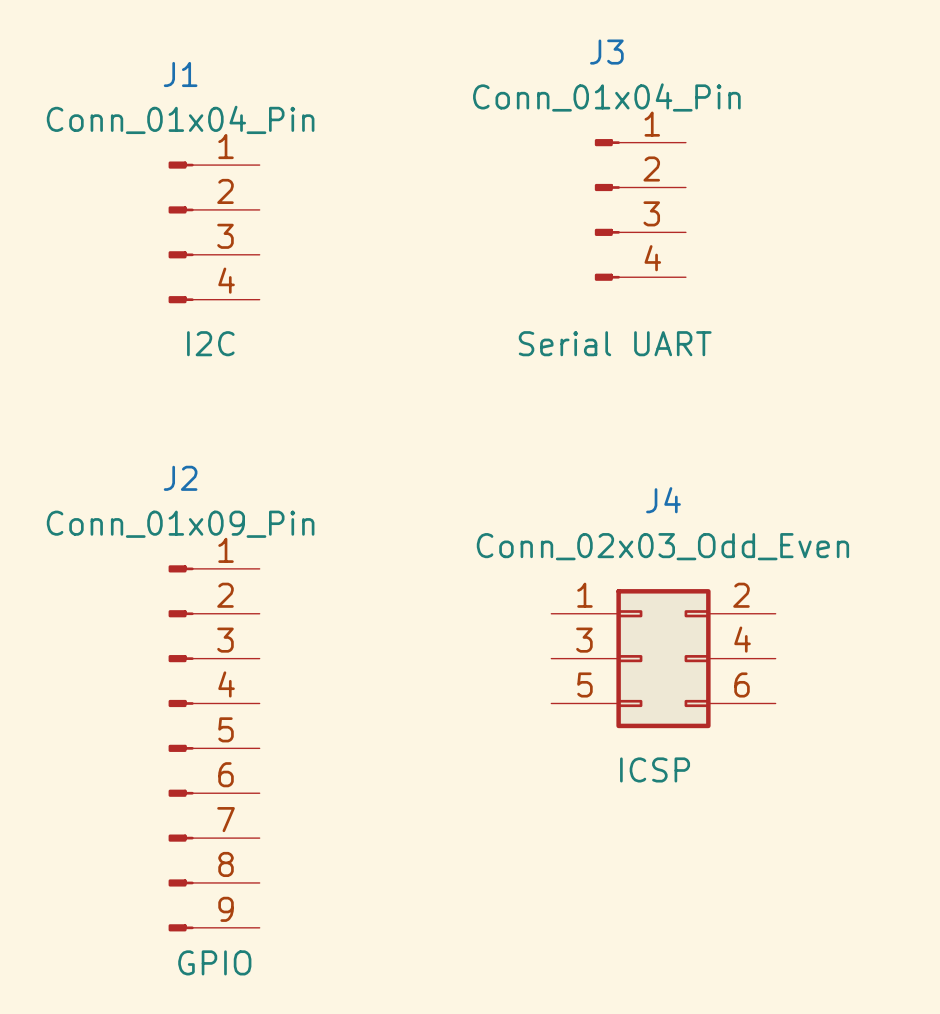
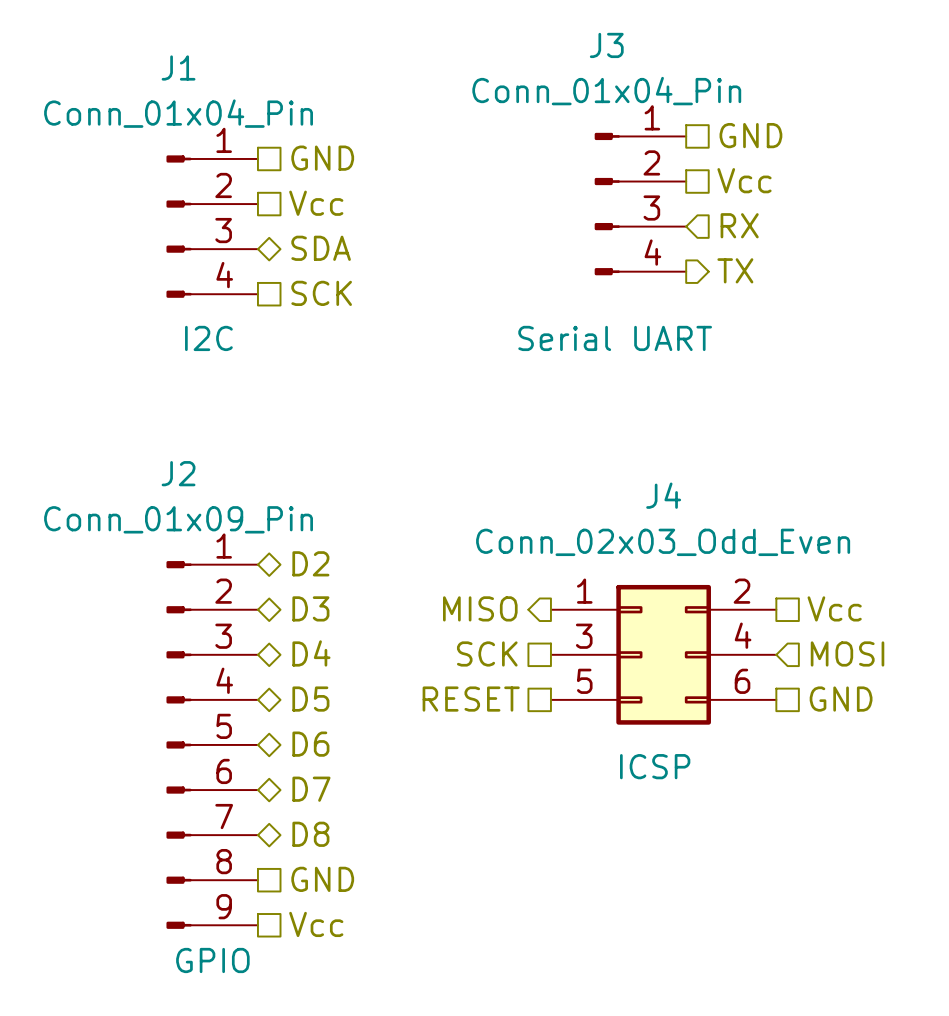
hierarchical label: none -> GND (750, 135)
hierarchical label: none -> GND (322, 158)
hierarchical label: none -> Vcc (744, 180)
hierarchical label: none -> Vcc (316, 203)
hierarchical label: none -> RX (739, 225)
hierarchical label: none -> SDA (321, 248)
hierarchical label: none -> TX (735, 270)
hierarchical label: none -> SCK (321, 293)
hierarchical label: none -> D2 (310, 563)
hierarchical label: none -> D3 (310, 608)
hierarchical label: none -> MISO (480, 608)
hierarchical label: none -> Vcc (834, 608)
hierarchical label: none -> D4 (311, 653)
hierarchical label: none -> SCK (487, 653)
hierarchical label: none -> MOSI (847, 653)
hierarchical label: none -> D5 (310, 699)
hierarchical label: none -> RESET (471, 699)
hierarchical label: none -> GND (841, 699)
hierarchical label: none -> D6 (310, 744)
hierarchical label: none -> D7 (311, 789)
hierarchical label: none -> D8 (310, 834)
hierarchical label: none -> GND (322, 879)
hierarchical label: none -> Vcc (316, 924)

